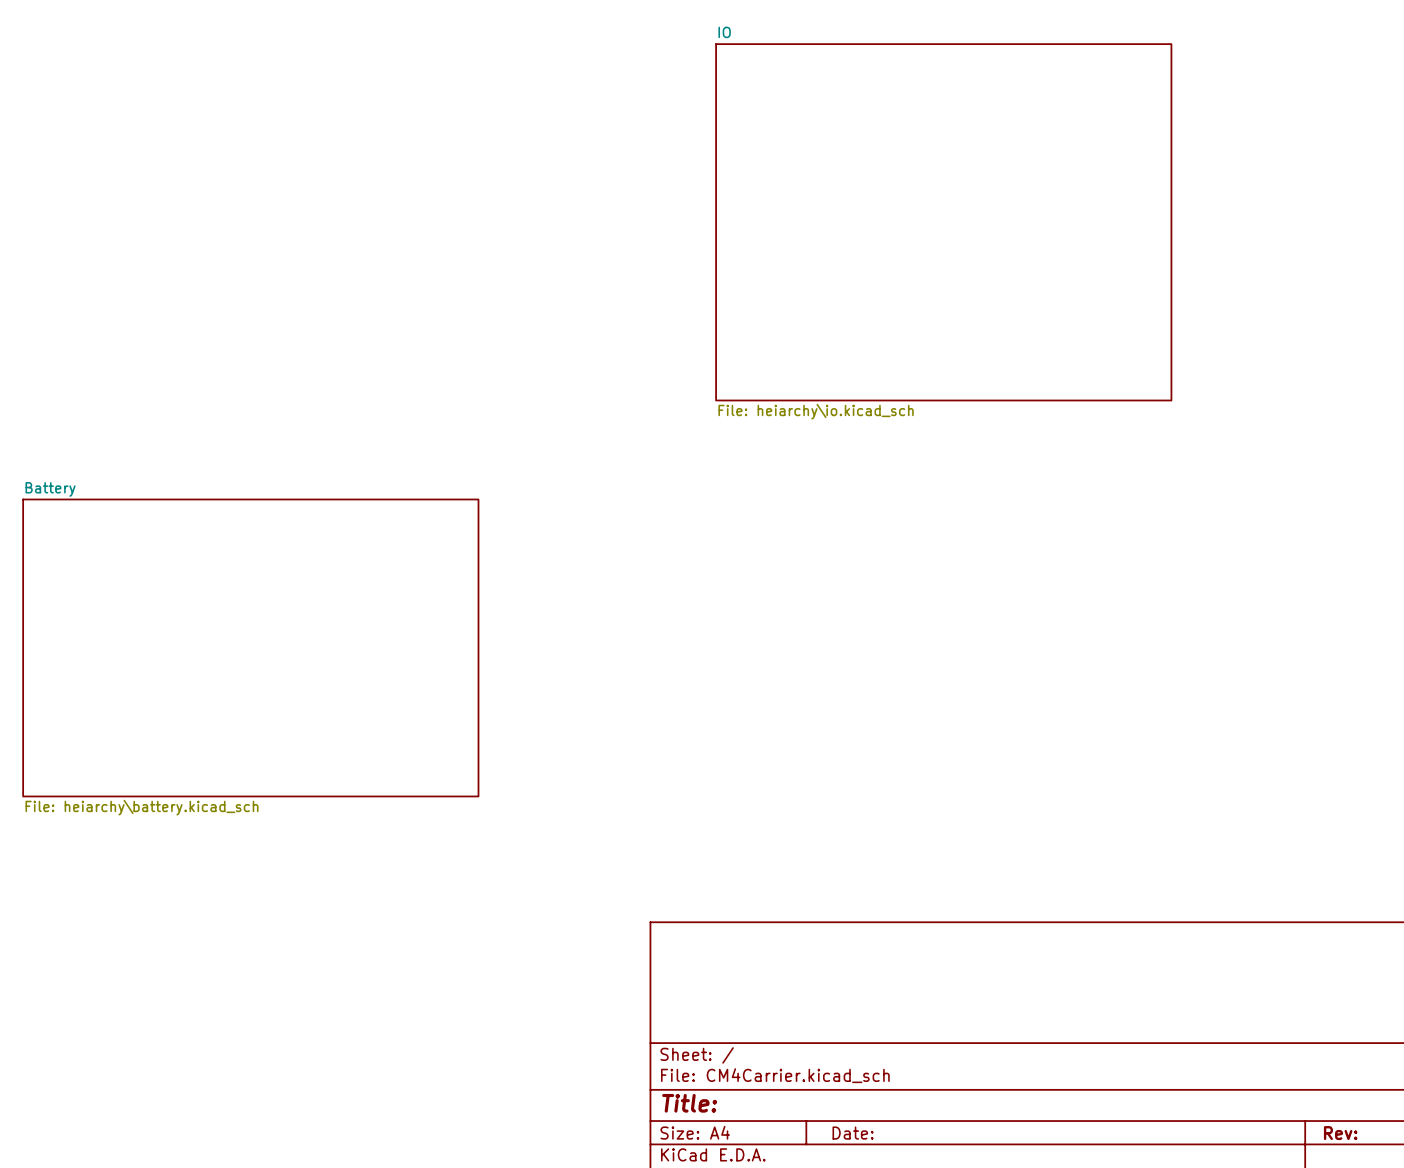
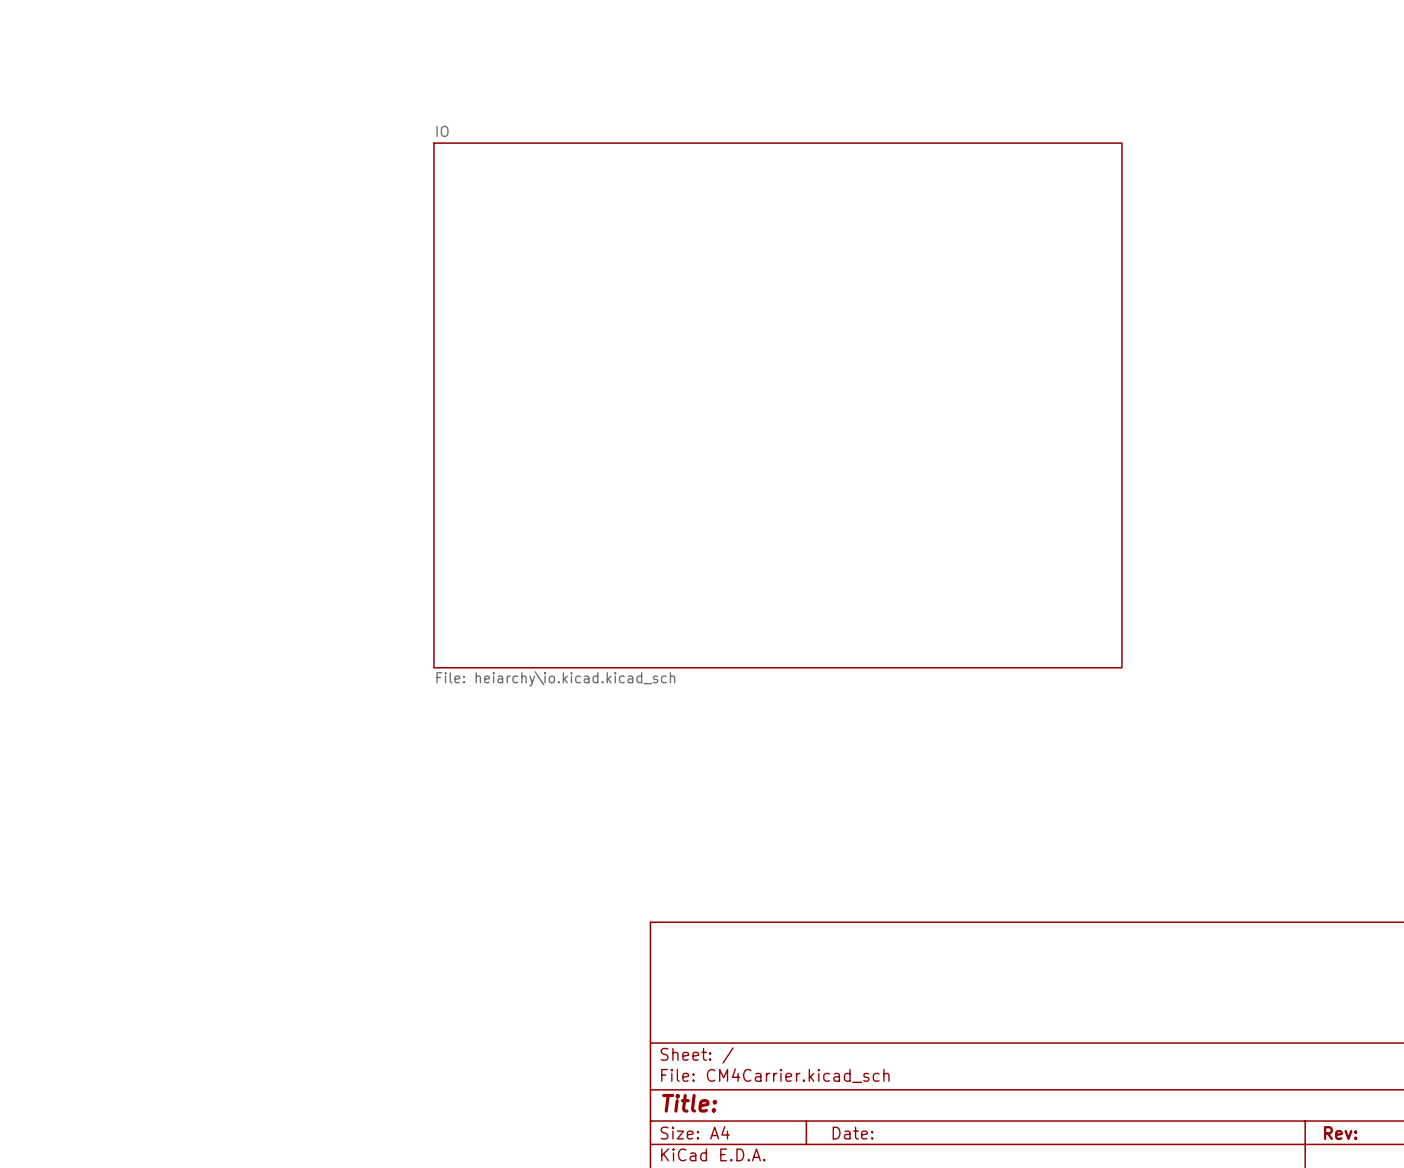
sheet IO: File: heiarchy\io.kicad_sch (943, 222) -> none
sheet IO: none -> File: heiarchy\io.kicad.kicad_sch (777, 405)
sheet Battery: File: heiarchy\battery.kicad_sch (250, 647) -> none

